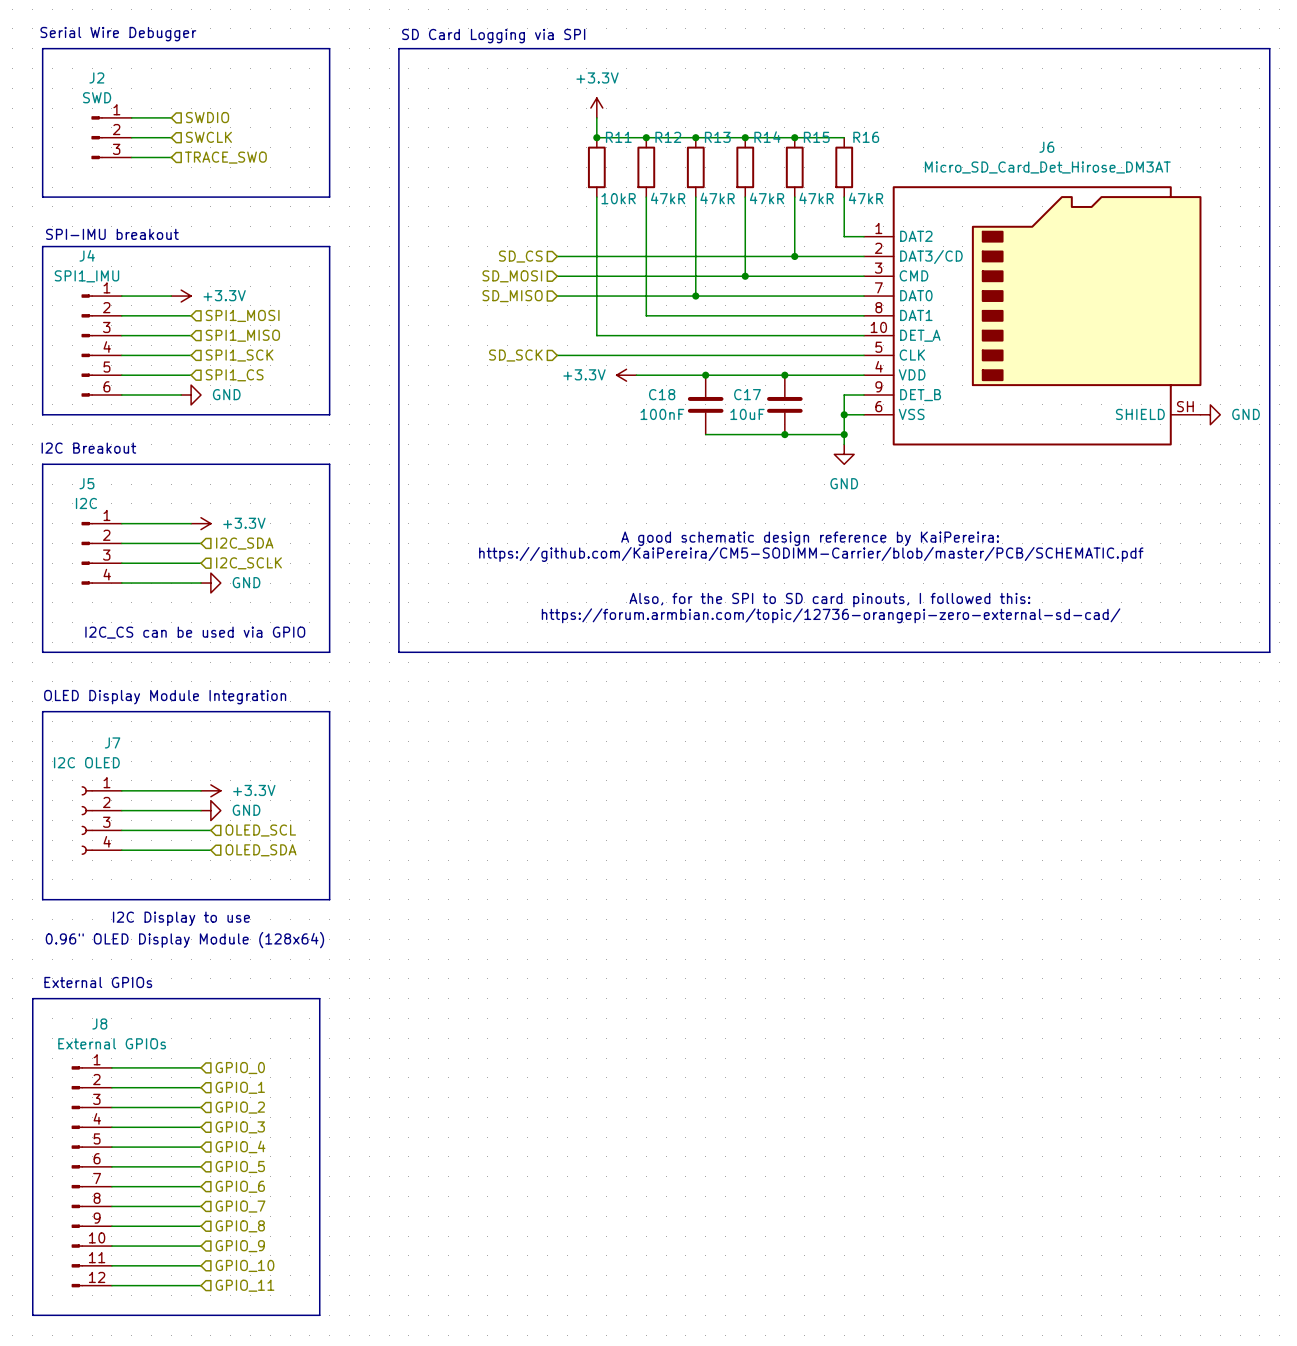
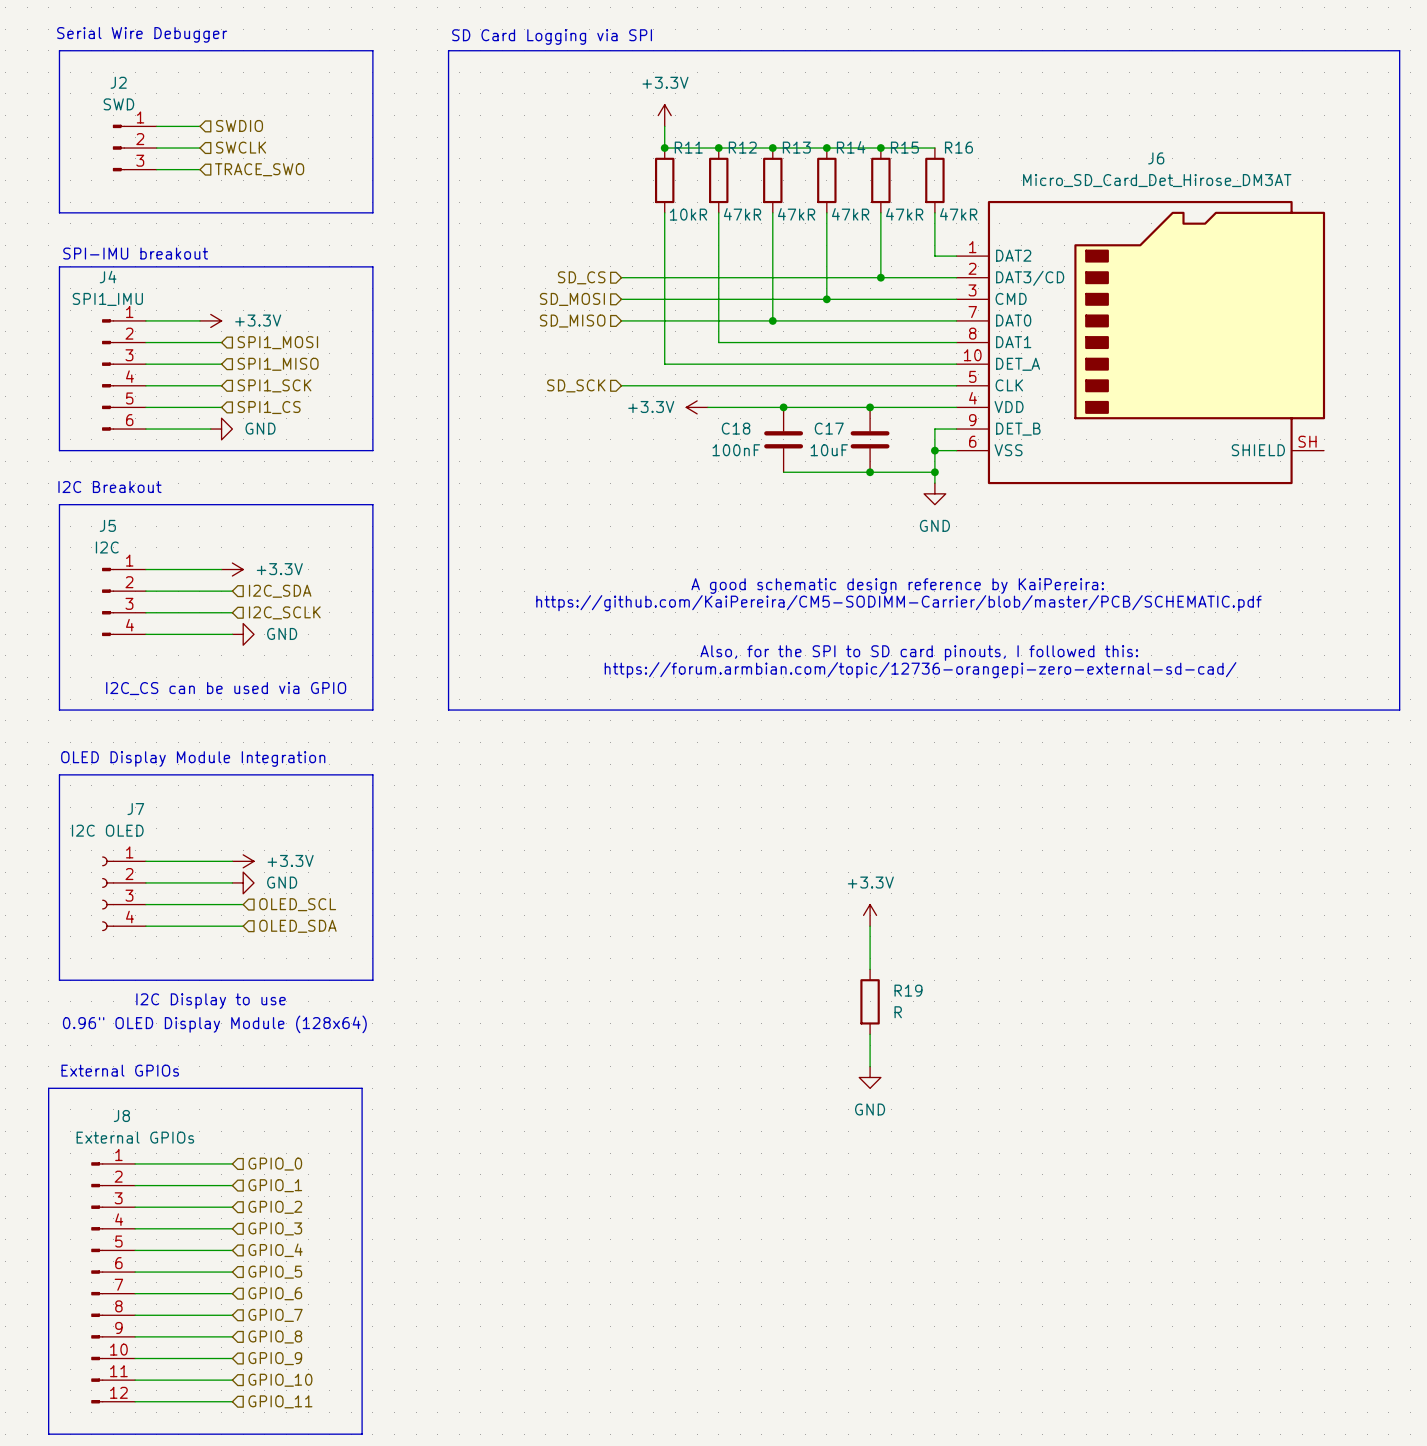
power symbol: GND (1210, 414) -> none
power symbol: none -> +3.3V (870, 915)
wire: none -> (870, 926) (870, 969)
R19: none -> R (870, 1001)
wire: none -> (870, 1034) (870, 1066)
power symbol: none -> GND (870, 1077)

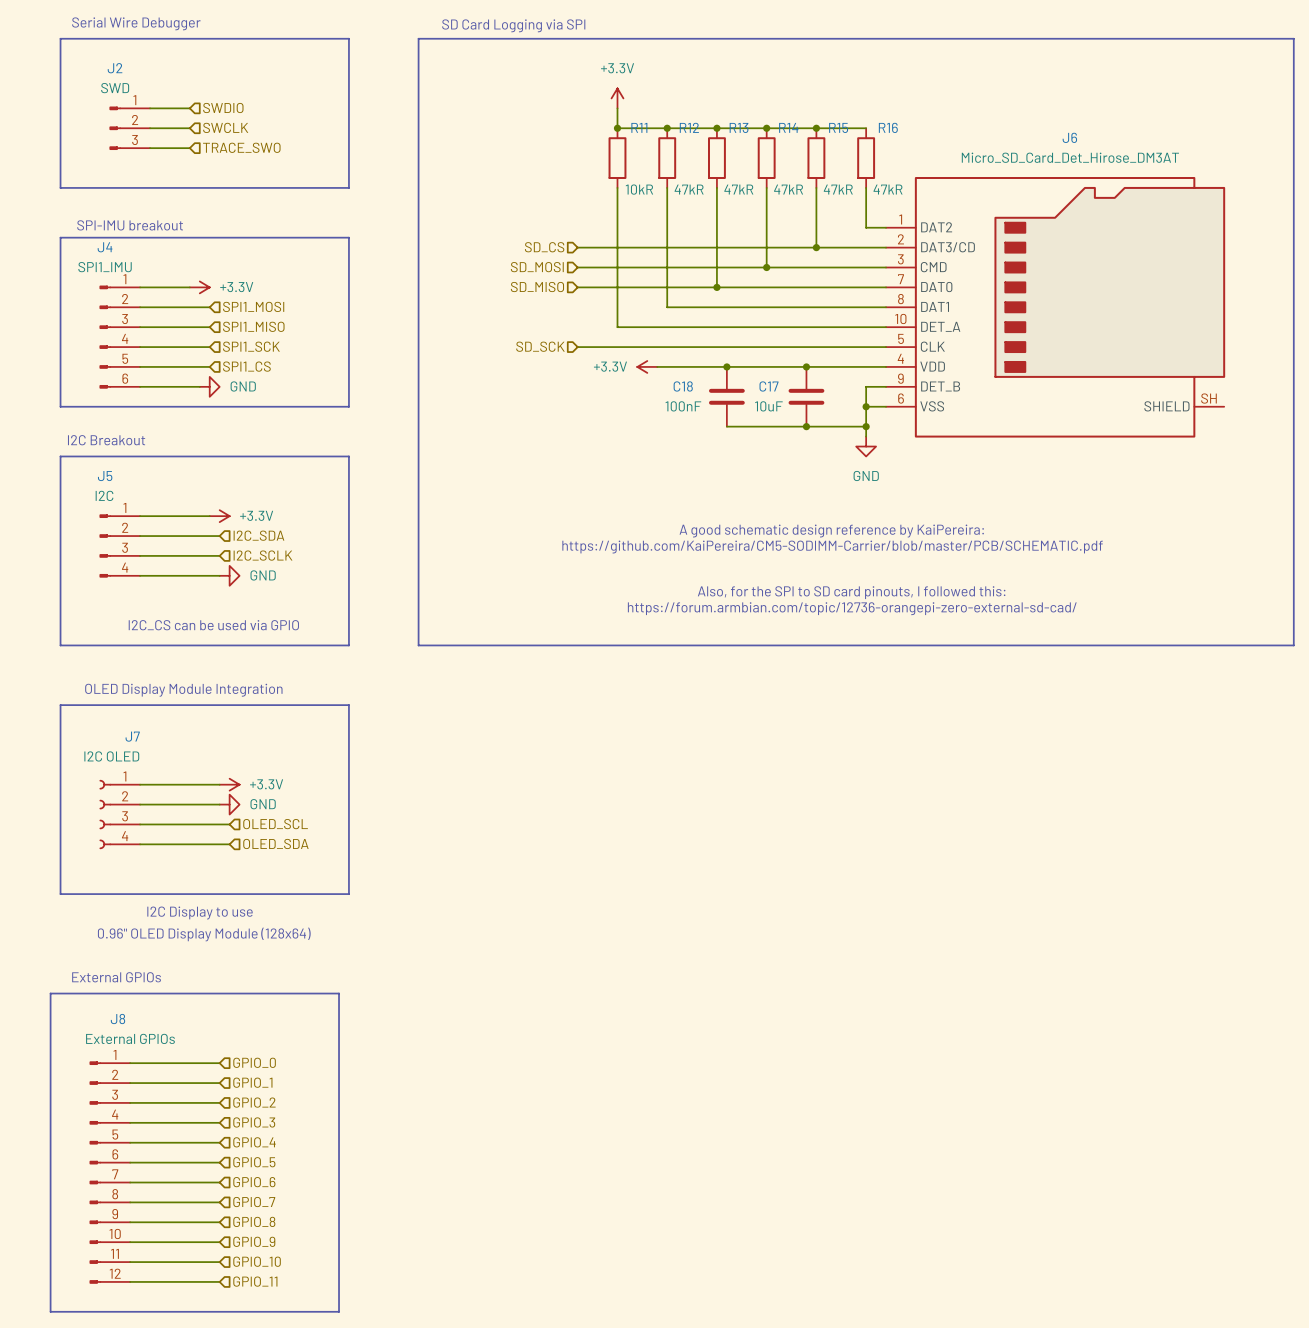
power symbol: +3.3V (870, 915) -> none
wire: (870, 926) (870, 969) -> none
R19: R (870, 1001) -> none
wire: (870, 1034) (870, 1066) -> none
power symbol: GND (870, 1077) -> none

